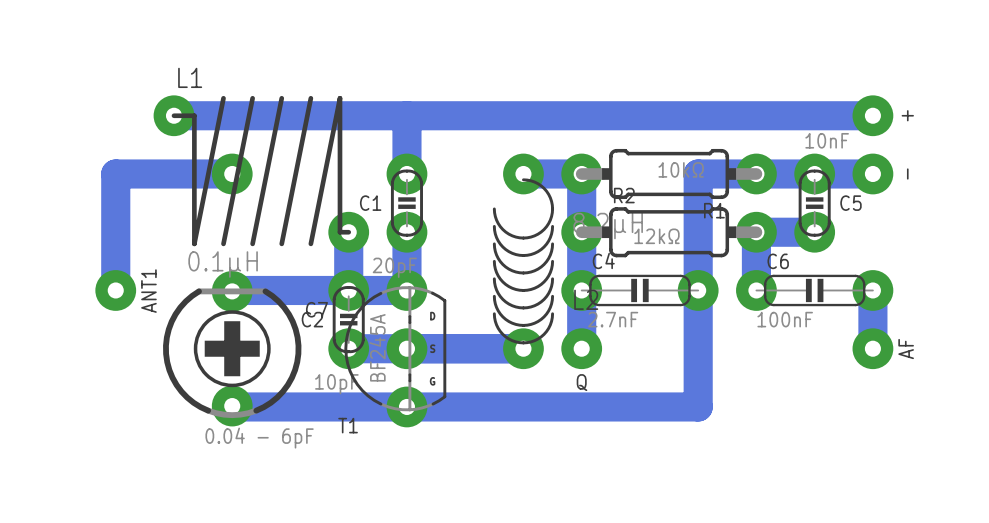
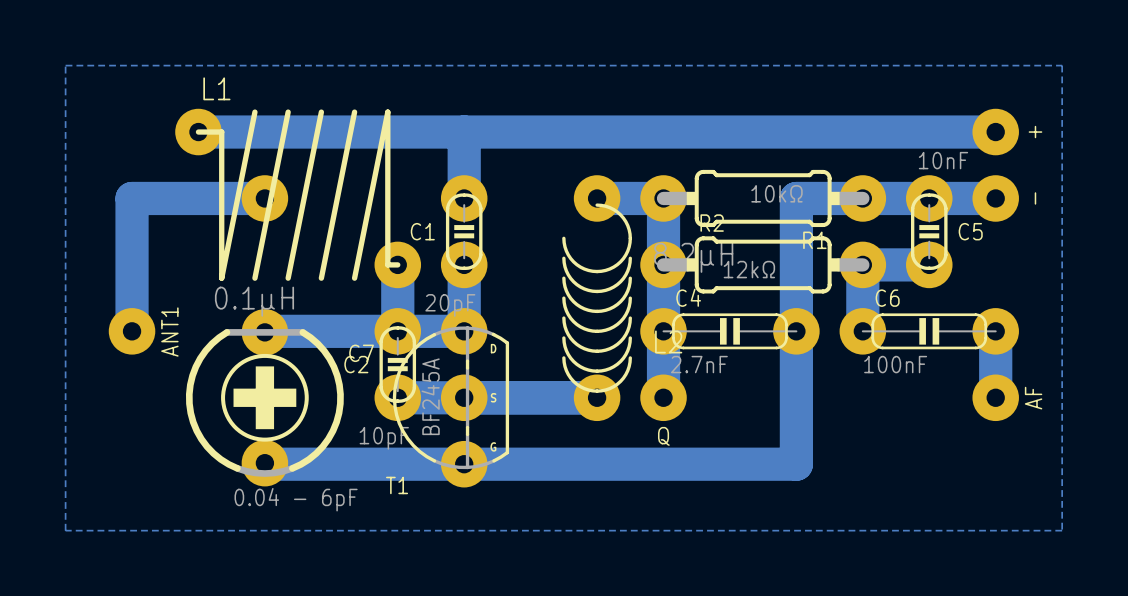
bottom zone outline: none -> (65, 65) (65, 530) (1062, 530) (1062, 65) (65, 65)
T1 footprint: [344, 270, 447, 428] -> [392, 308, 510, 488]

